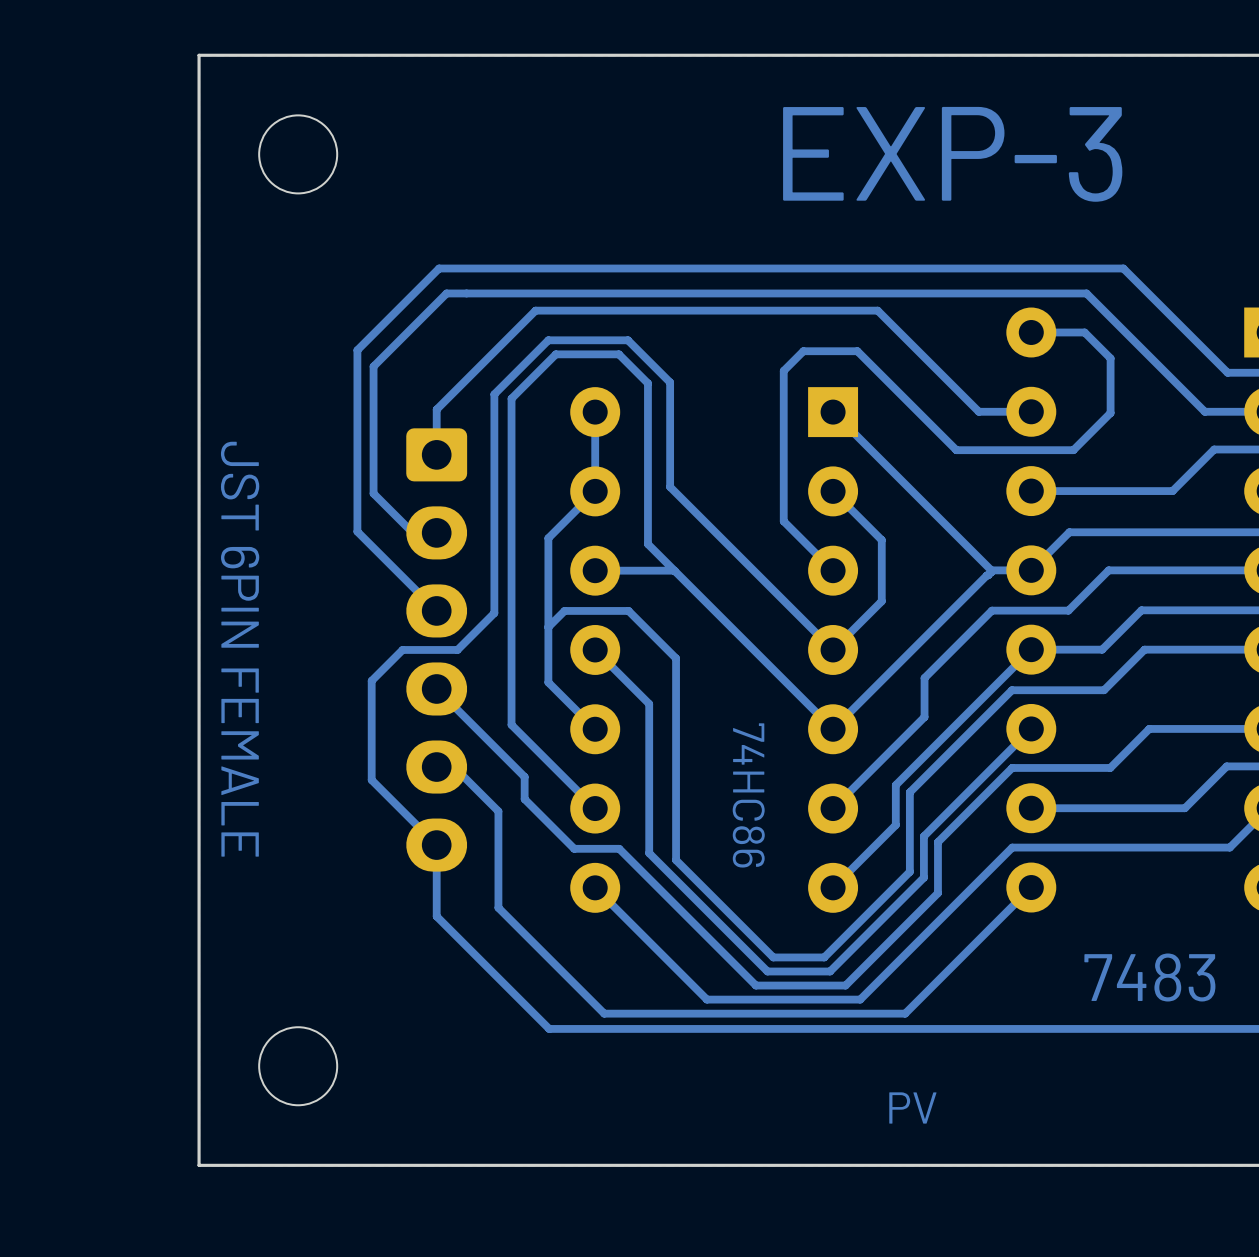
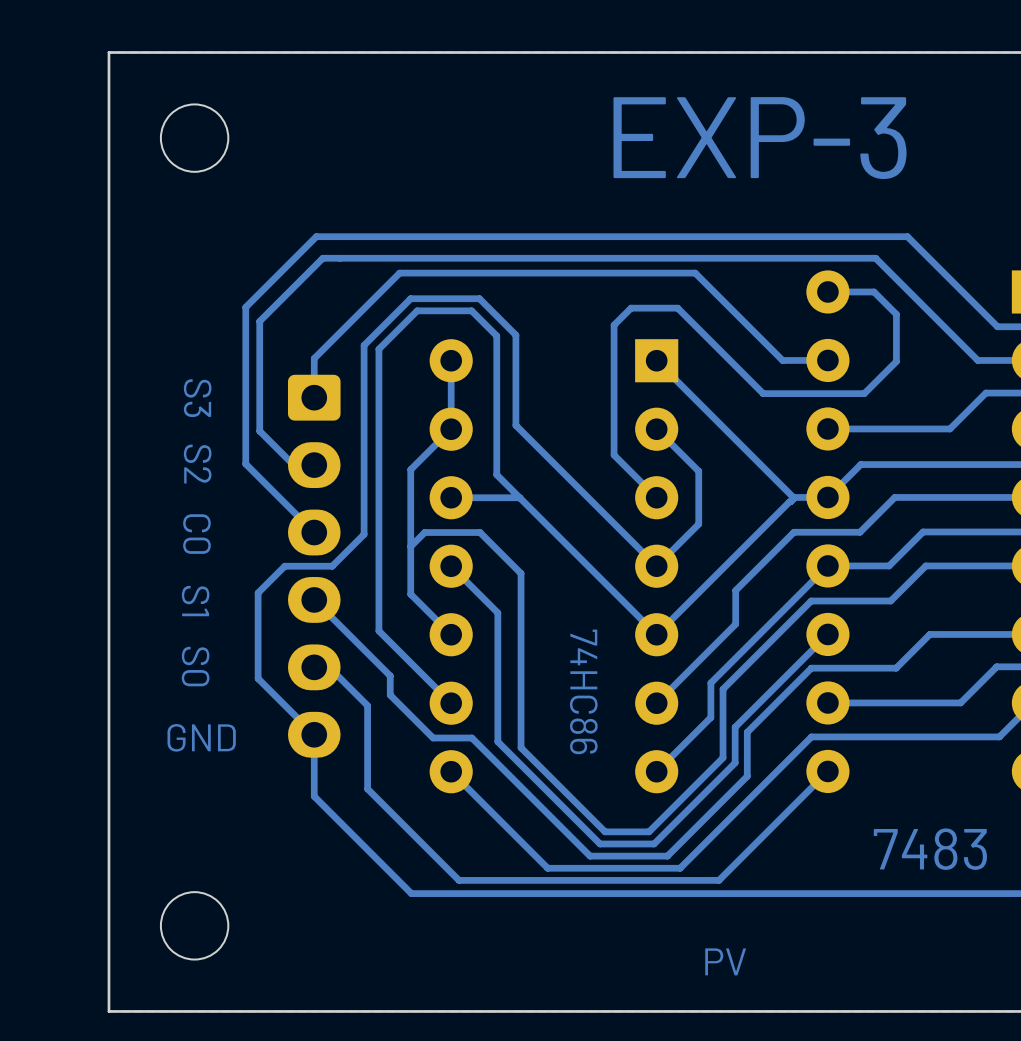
text: none -> S3 (197, 398)
text: none -> S2 (197, 464)
text: none -> C0 (196, 534)
text: JST 6PIN FEMALE (240, 649) -> none
text: none -> S1 (195, 601)
text: none -> S0 (195, 666)
text: none -> GND (201, 737)

